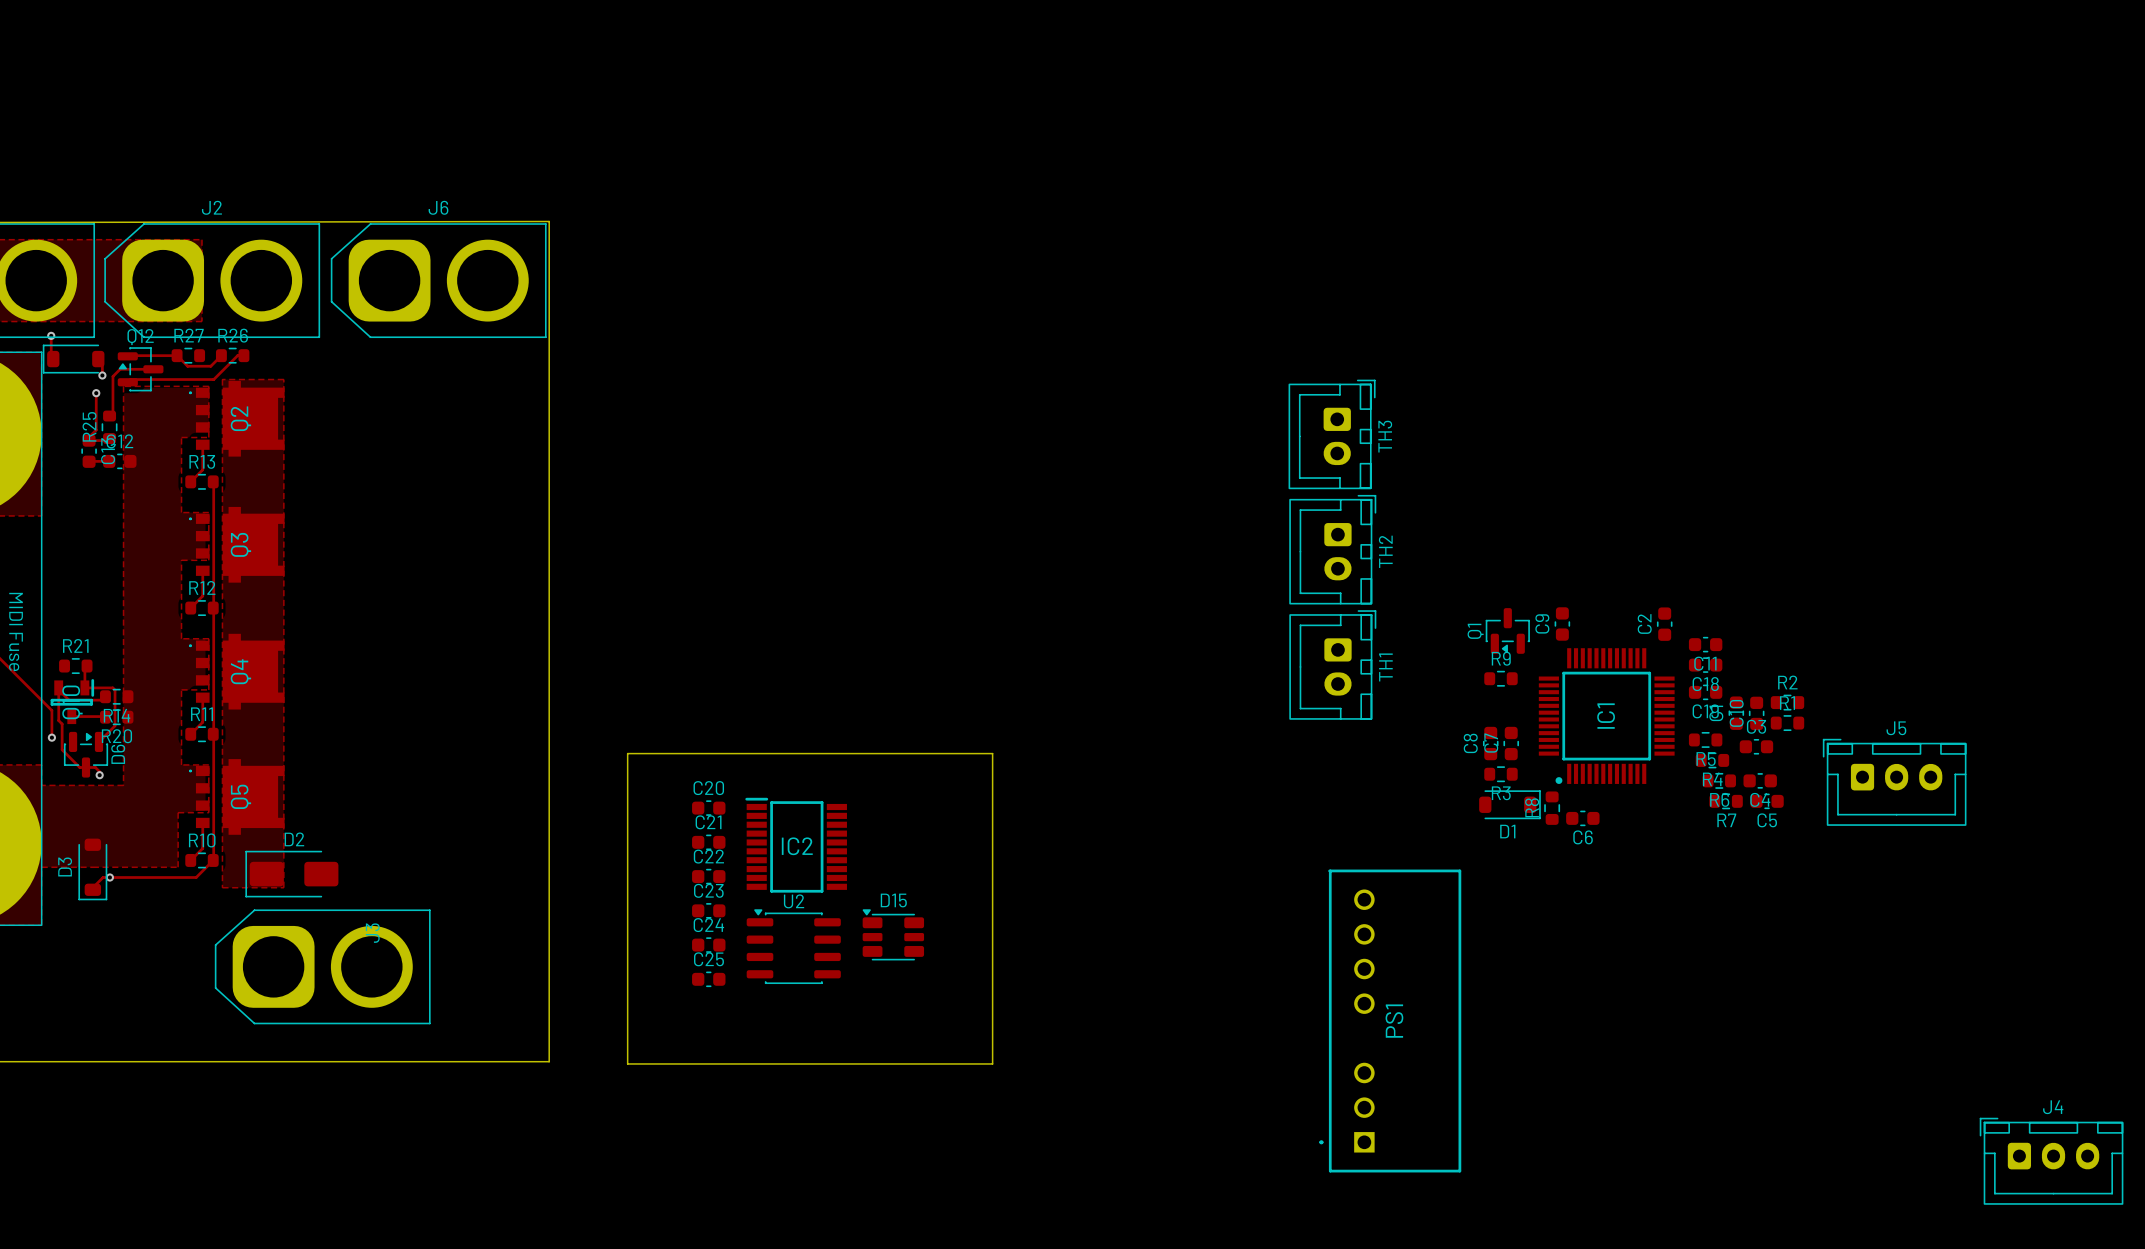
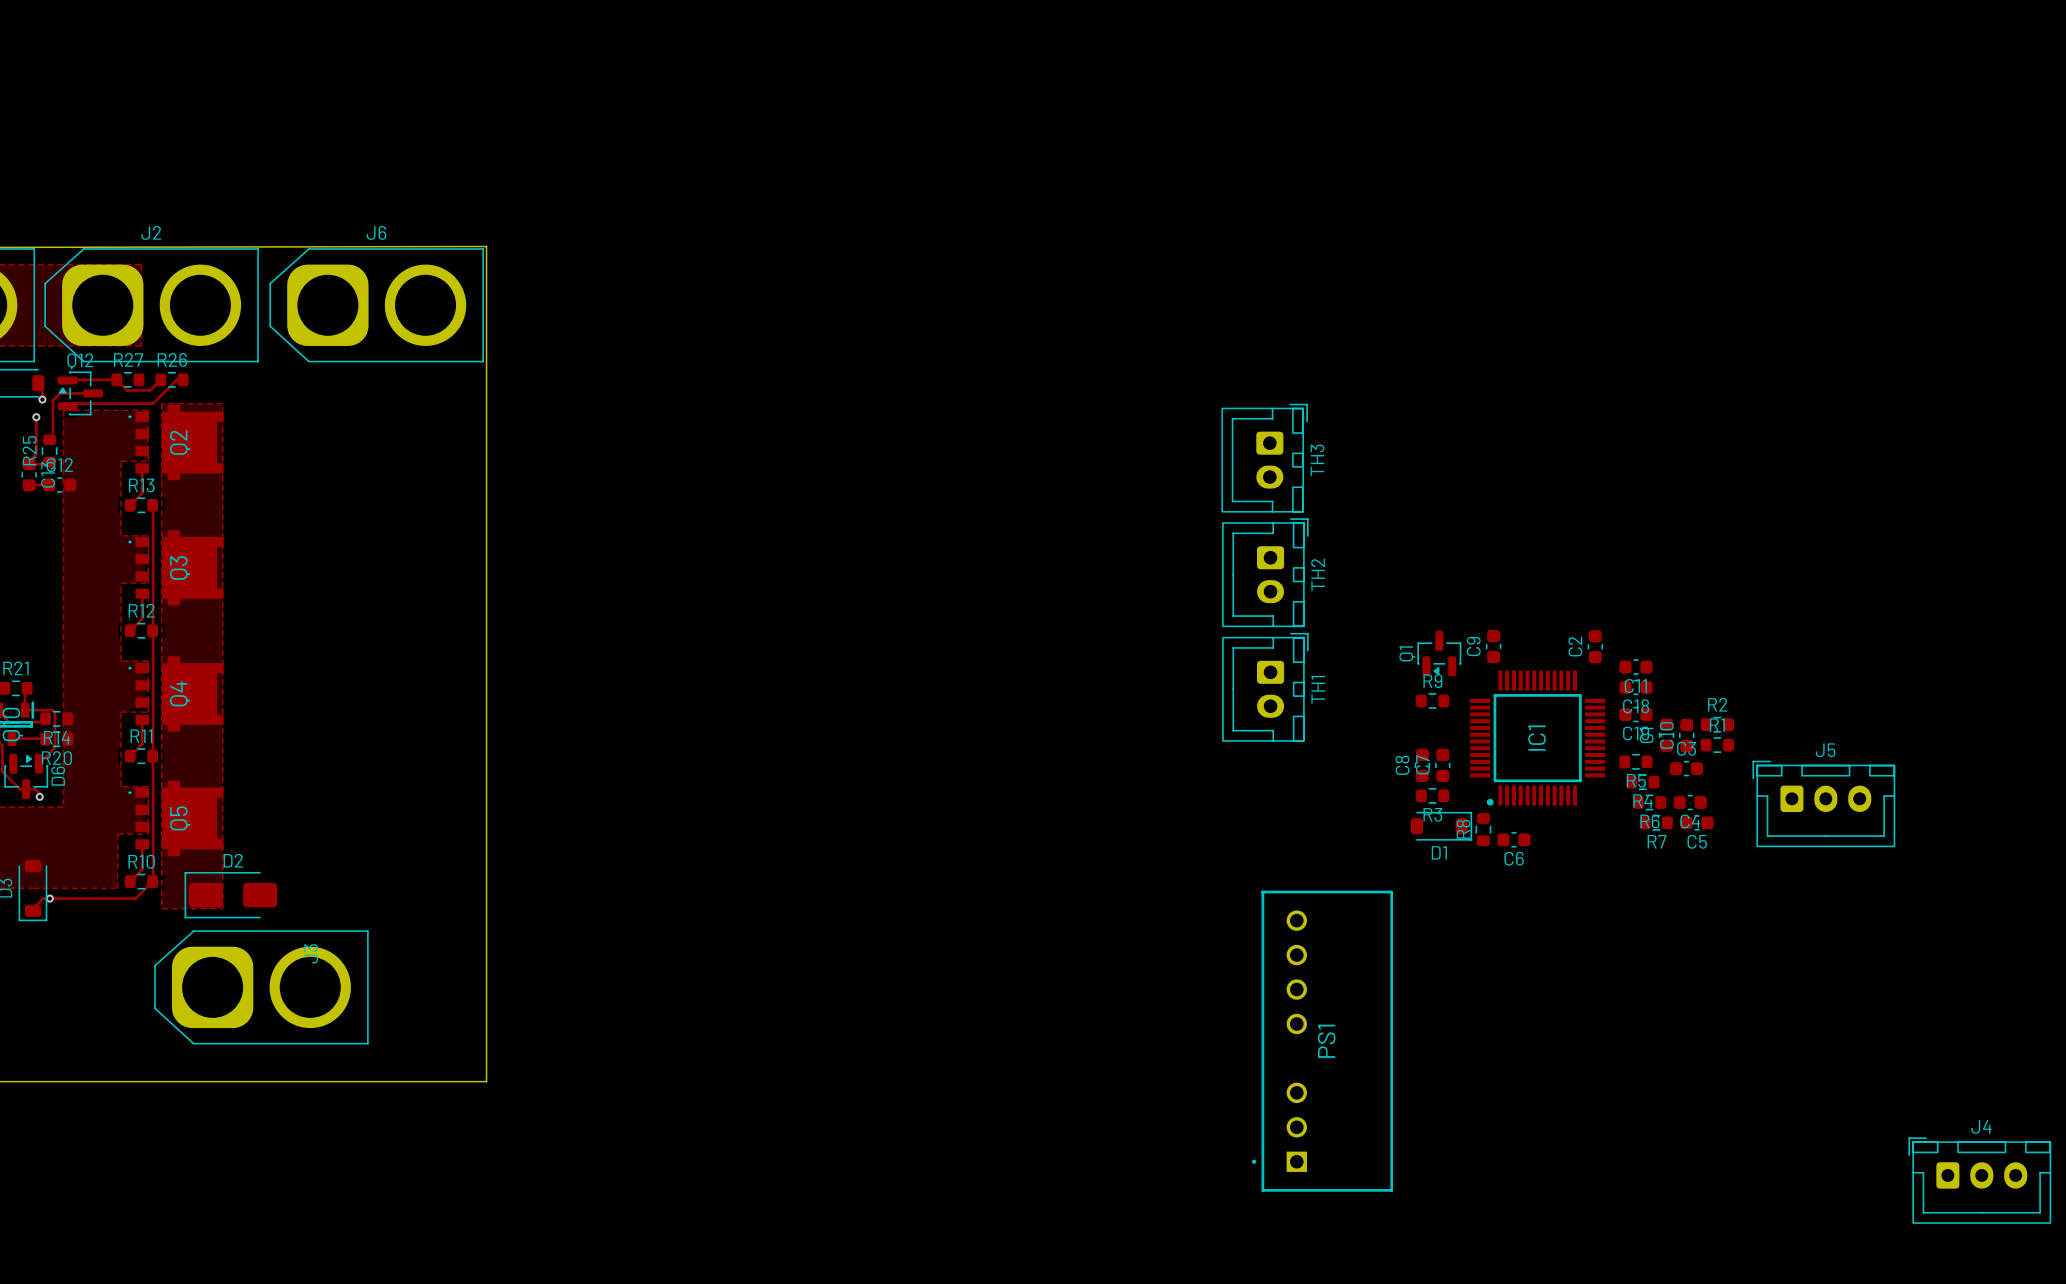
board edge: (627, 753) (992, 753) (992, 1063) (627, 1063) (627, 753) -> none
C20: (708, 808) -> none
C21: (708, 842) -> none
IC2: (796, 845) -> none
C22: (708, 876) -> none
C23: (708, 910) -> none
D15: (893, 934) -> none
C24: (708, 945) -> none
U2: (793, 946) -> none
C25: (708, 979) -> none

